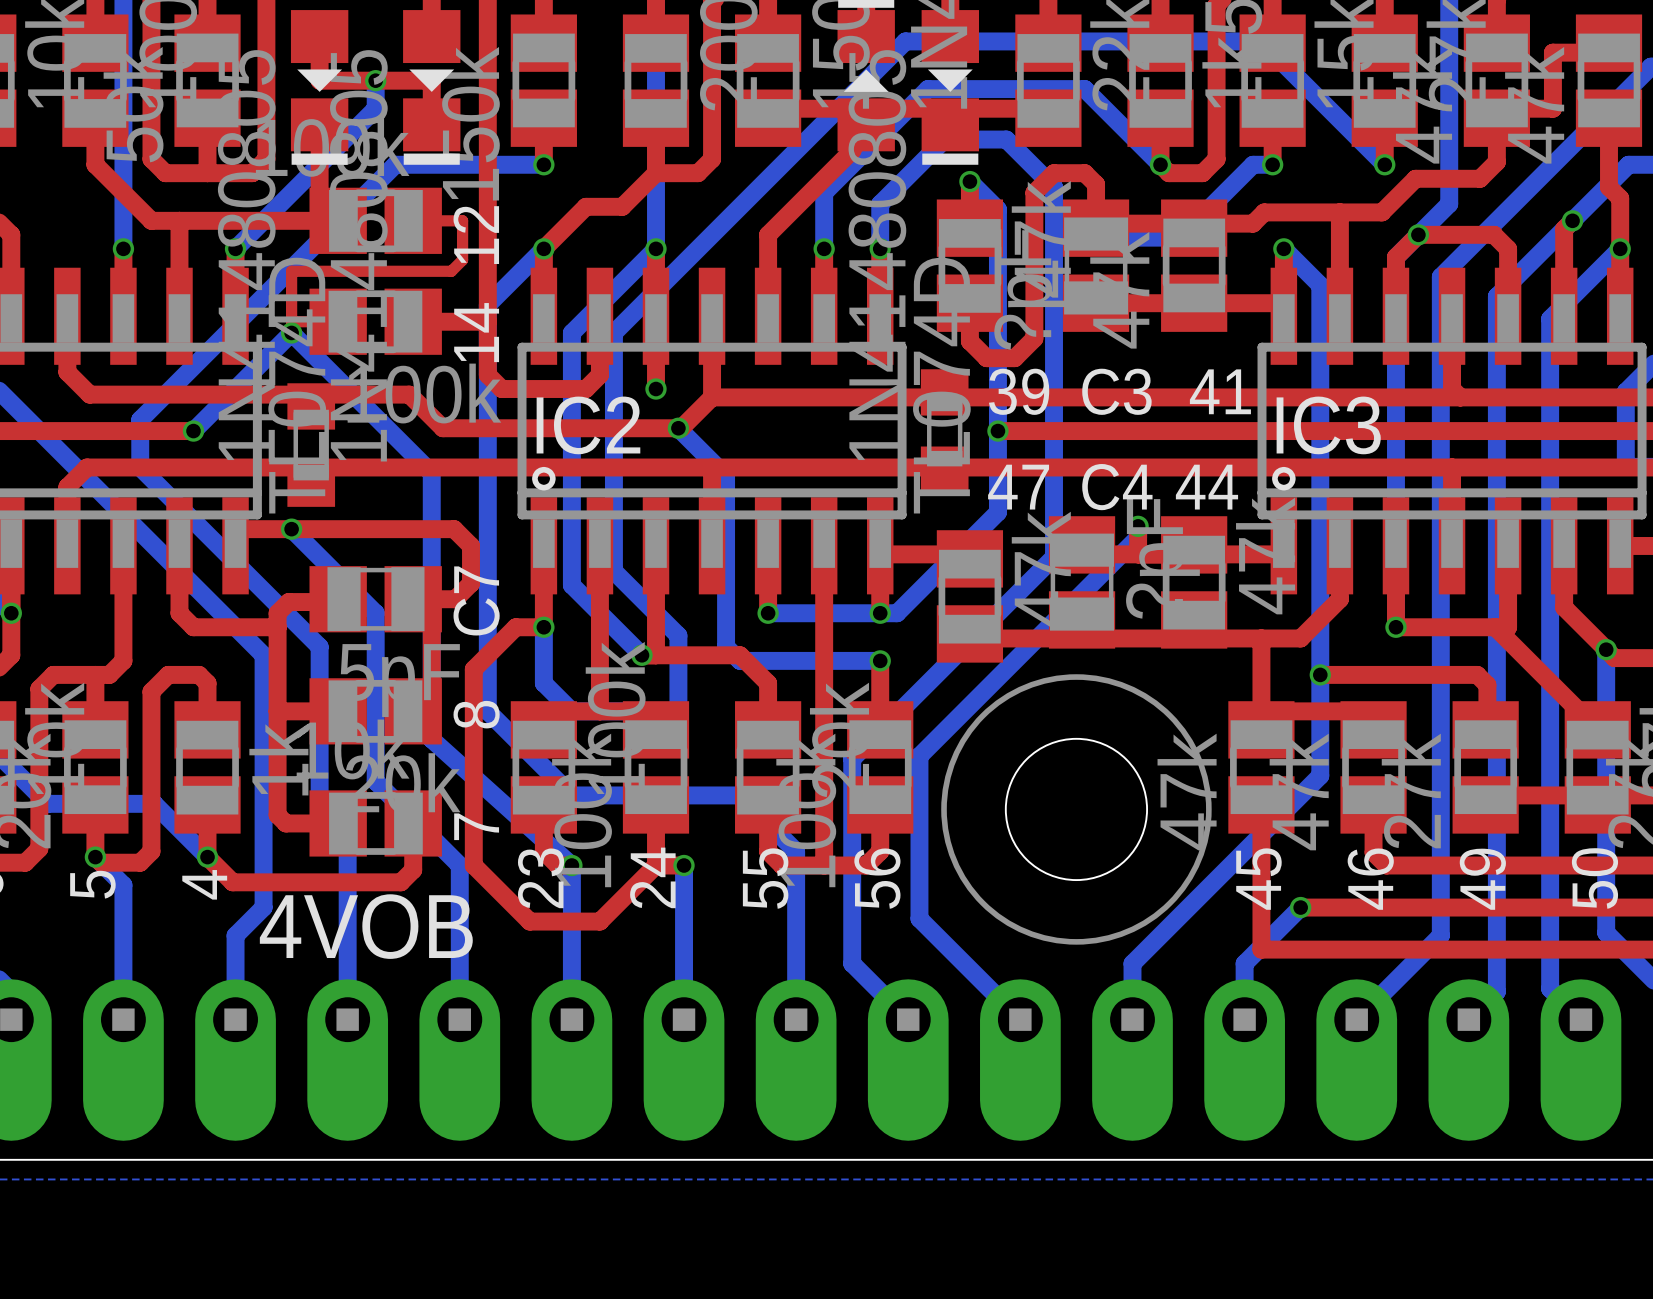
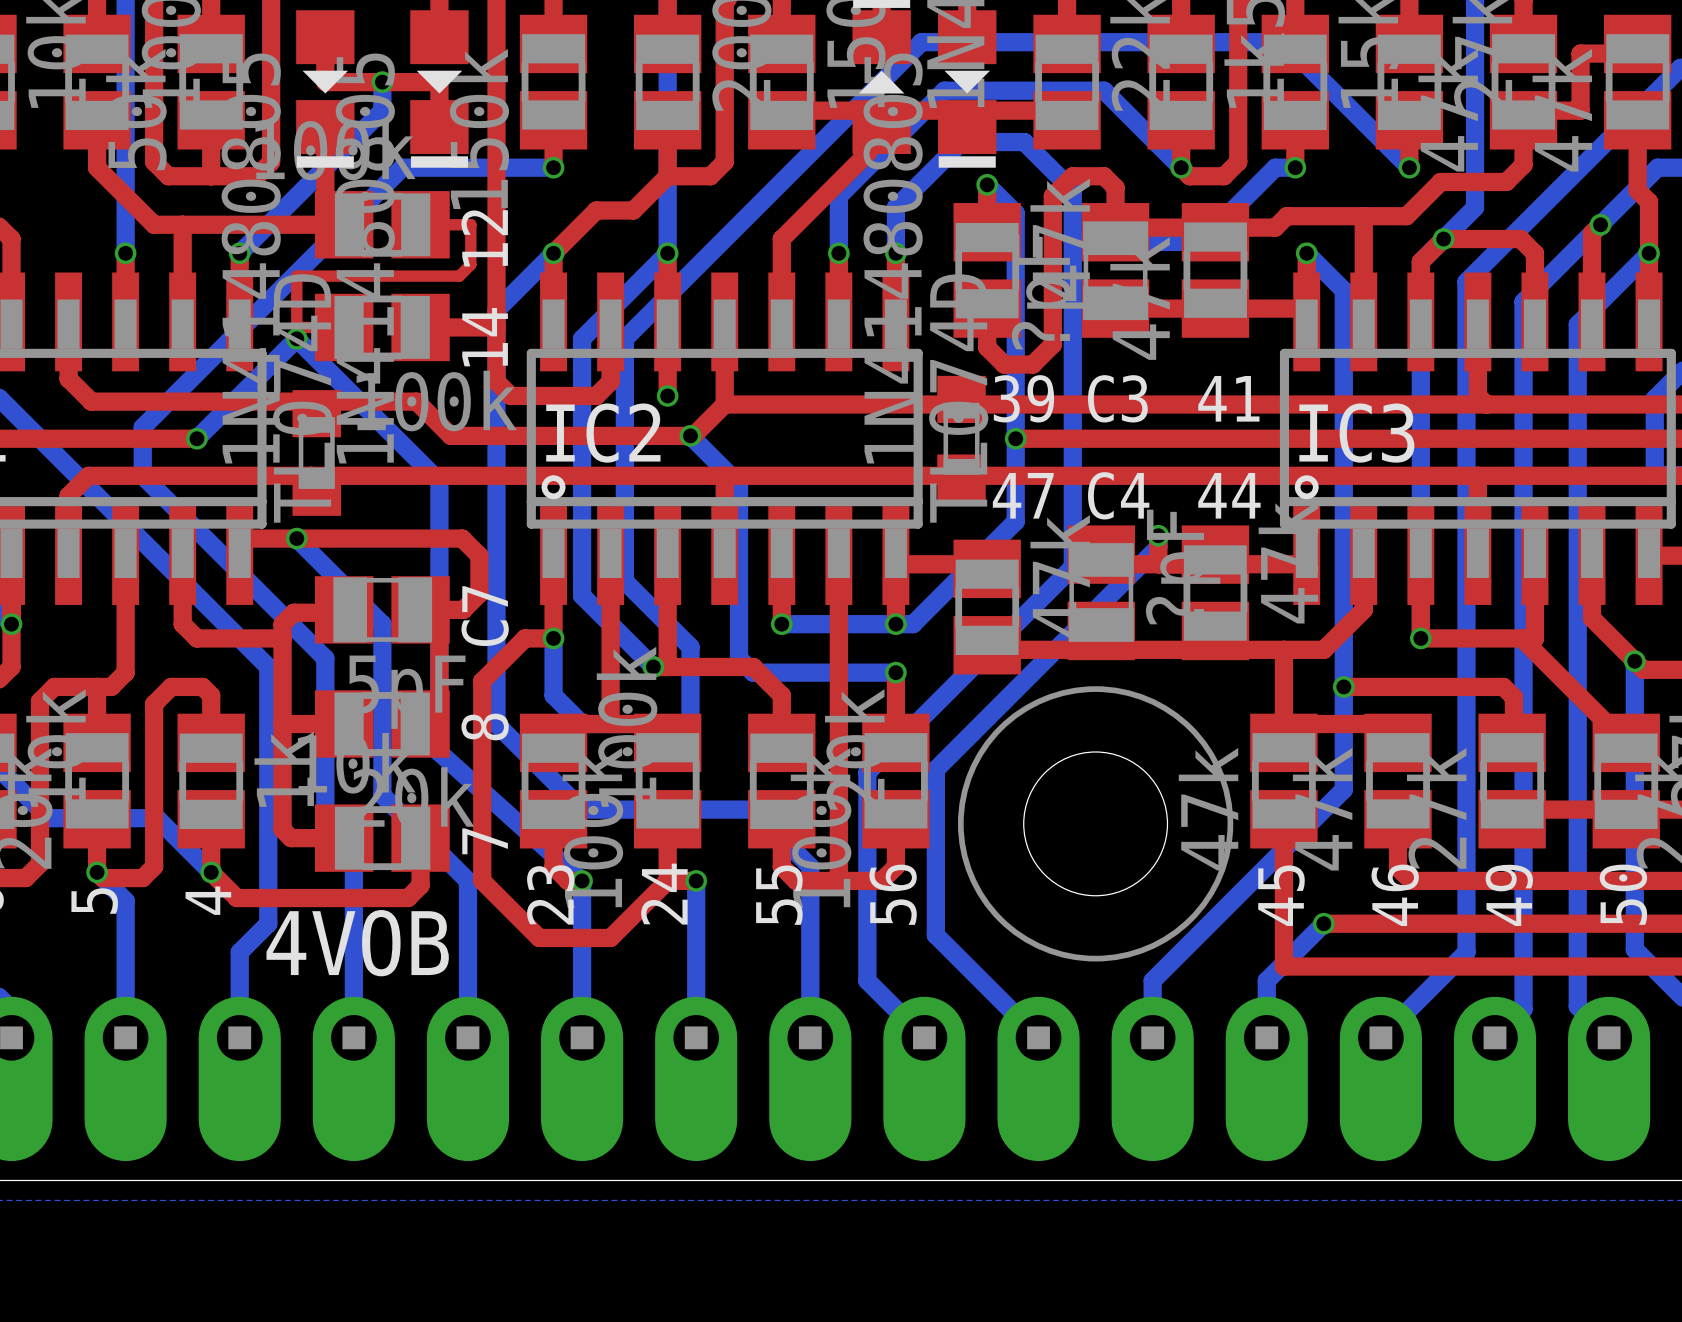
text position: 39 (1019, 391) -> 39 (1023, 398)
text position: C3 (1116, 391) -> C3 (1117, 398)
text position: 41 (1220, 391) -> 41 (1228, 398)
text position: 47 (1018, 487) -> 47 (1023, 495)
text position: C4 (1117, 487) -> C4 (1118, 495)

